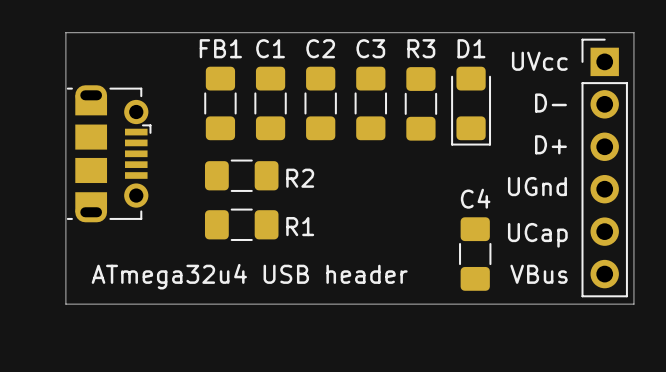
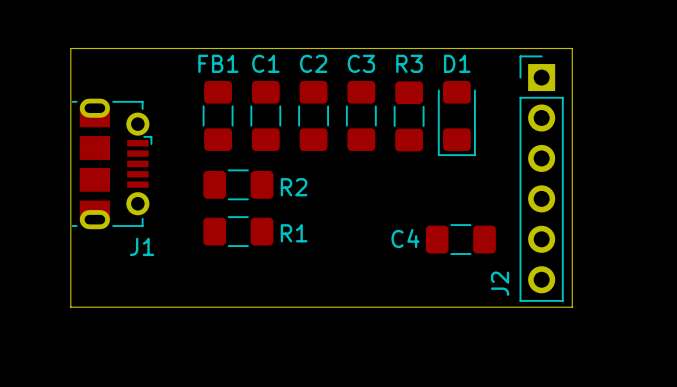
board edge: (592, 32) (633, 32) (633, 304) (592, 304) -> (572, 48) (572, 307)
text: UVcc (539, 61) -> none
text: D- (550, 103) -> none
text: D+ (550, 144) -> none
part: (604, 167) -> none
J2: none -> (541, 178)
text: UGnd (537, 186) -> none
C4 name position: C4 (475, 198) -> C4 (405, 238)
text: UCap (537, 235) -> none
J1 name: none -> J1 (142, 246)
C4 rotation: 0° (475, 254) -> 90° clockwise (460, 239)
text: VBus (539, 274) -> none
text: ATmega32u4 USB header (249, 276) -> none

